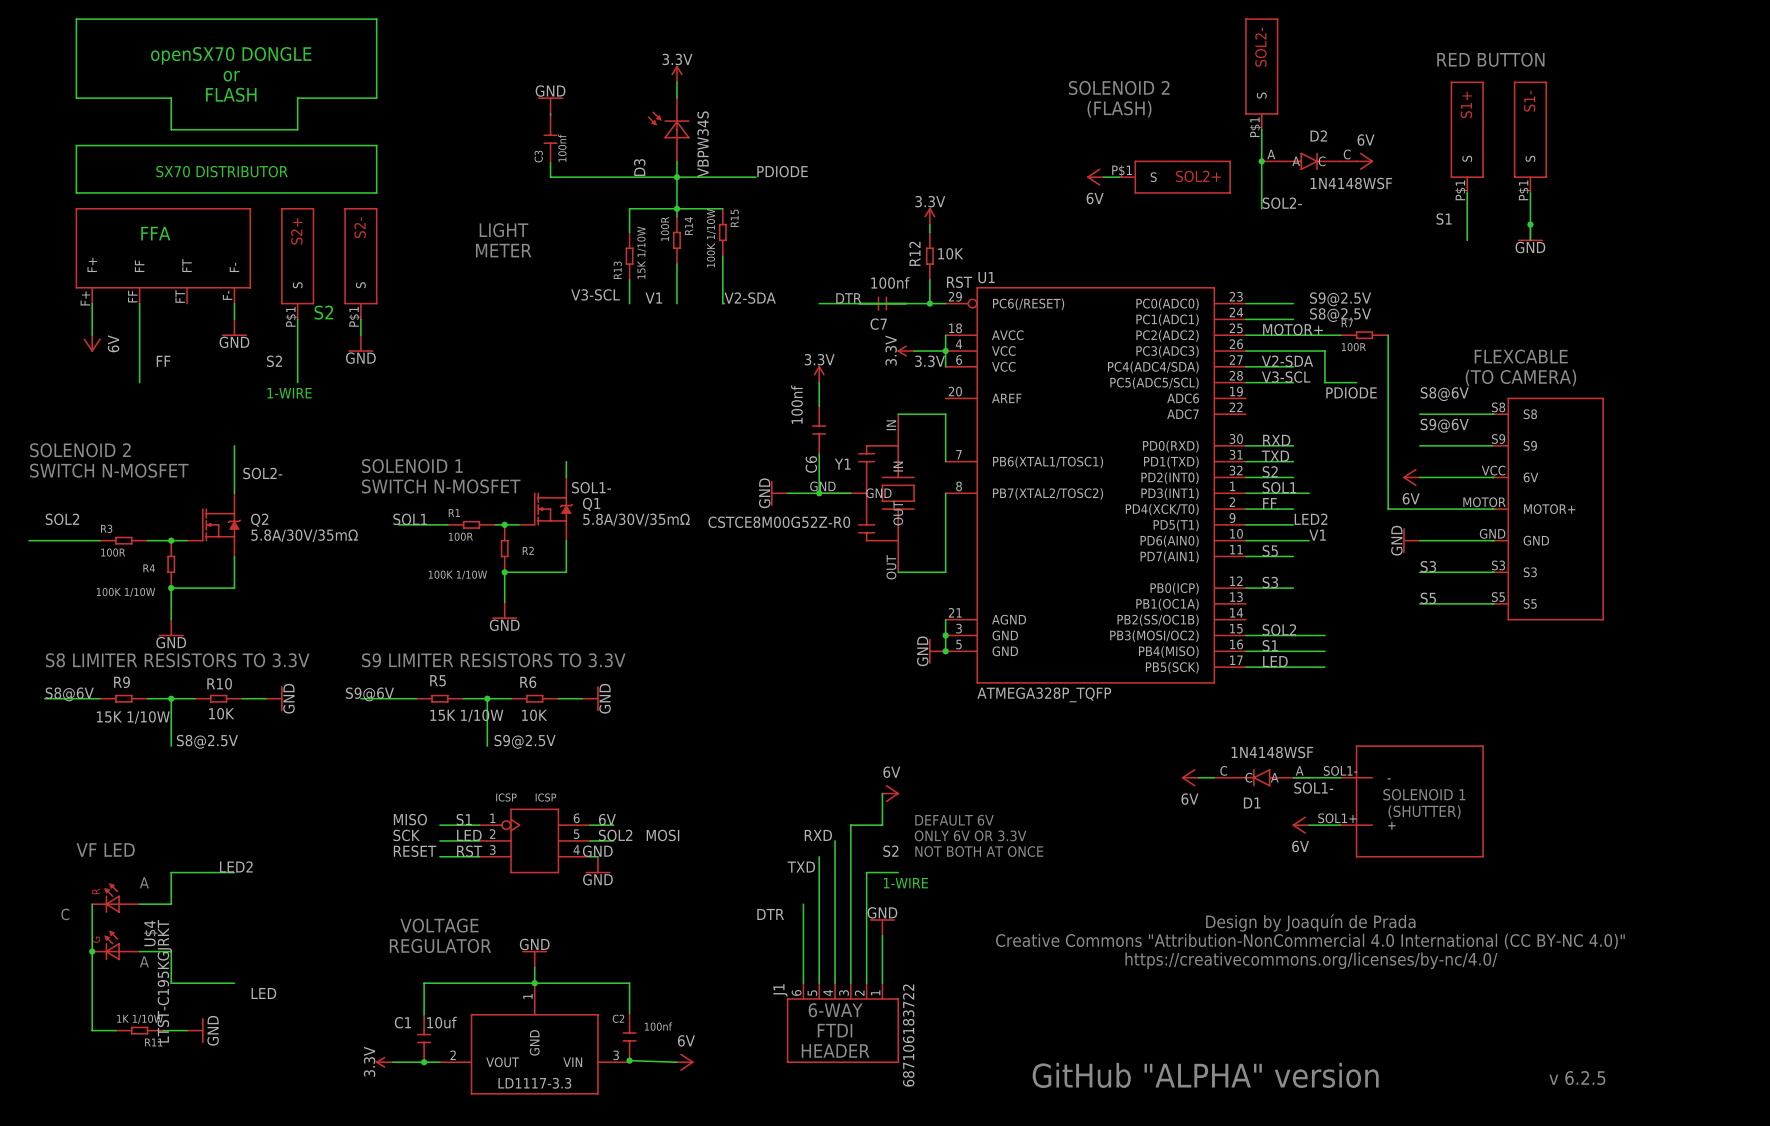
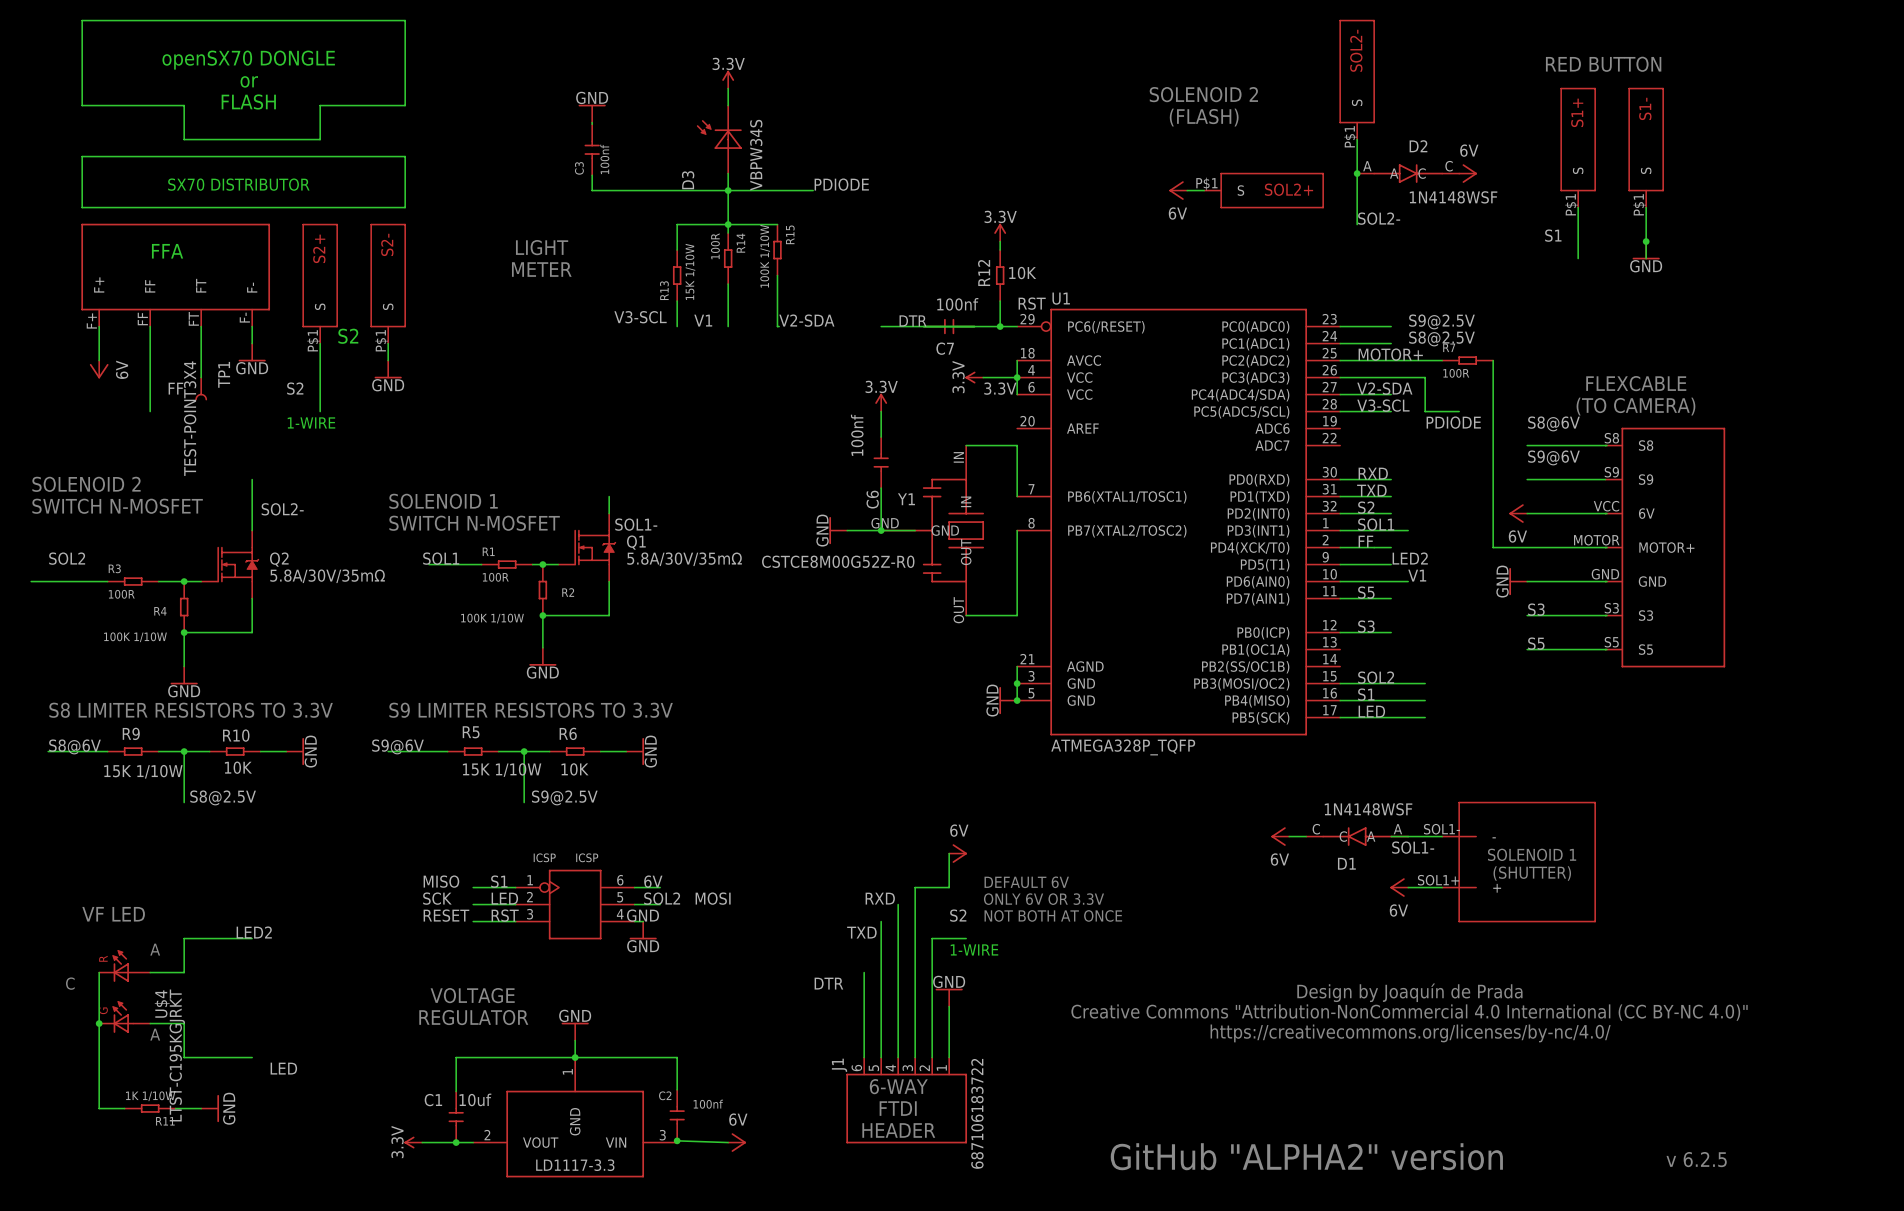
wire: none -> (201, 326) (201, 377)
TP1: none -> TEST-POINT3X4 (201, 388)
text: GitHub "ALPHA" version (1205, 1075) -> GitHub "ALPHA2" version (1306, 1156)

